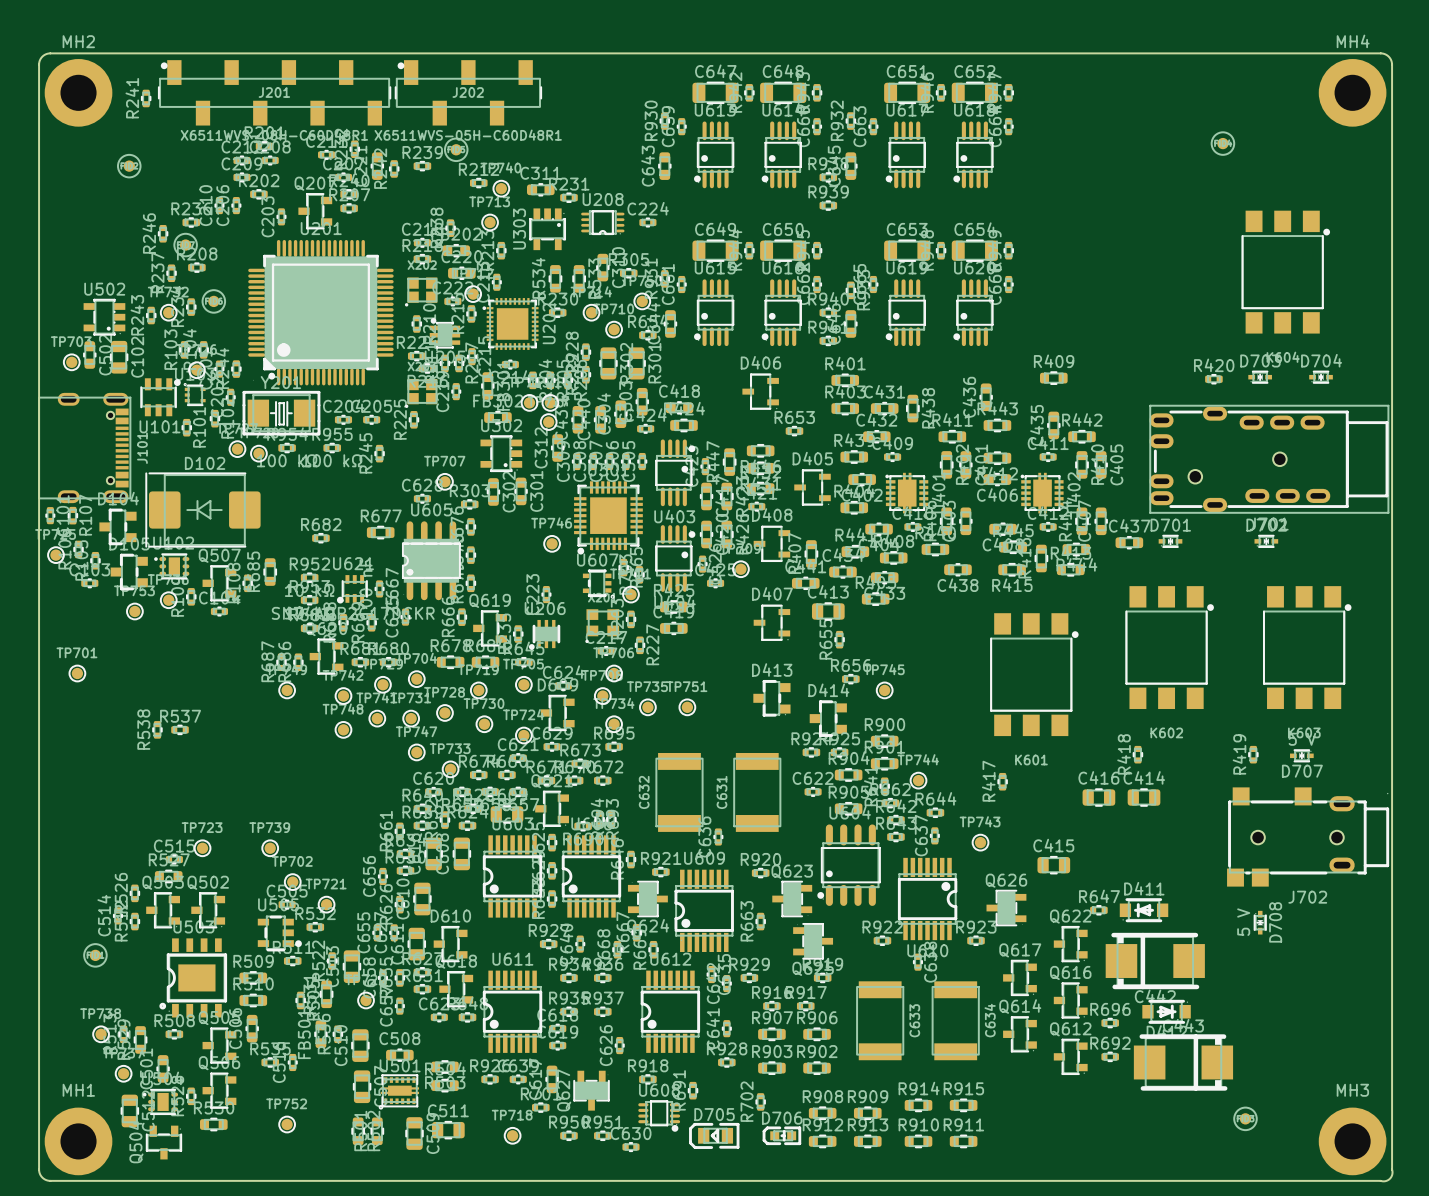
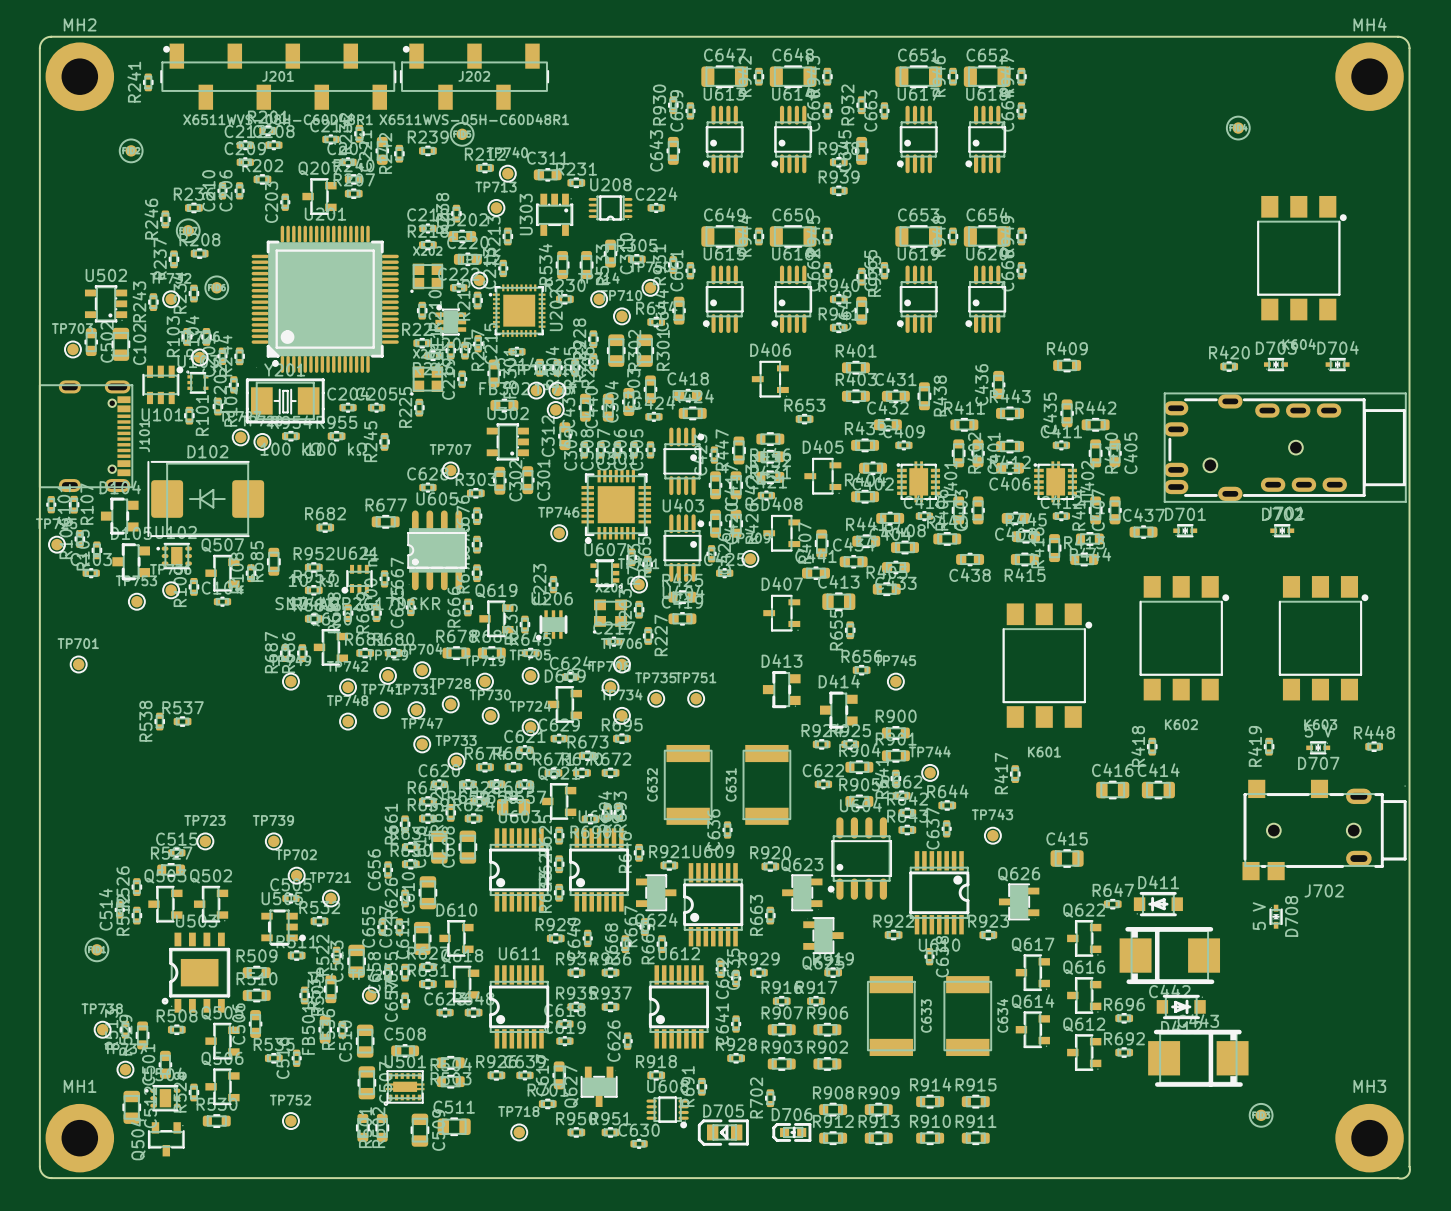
R448: none -> (1374, 746)

